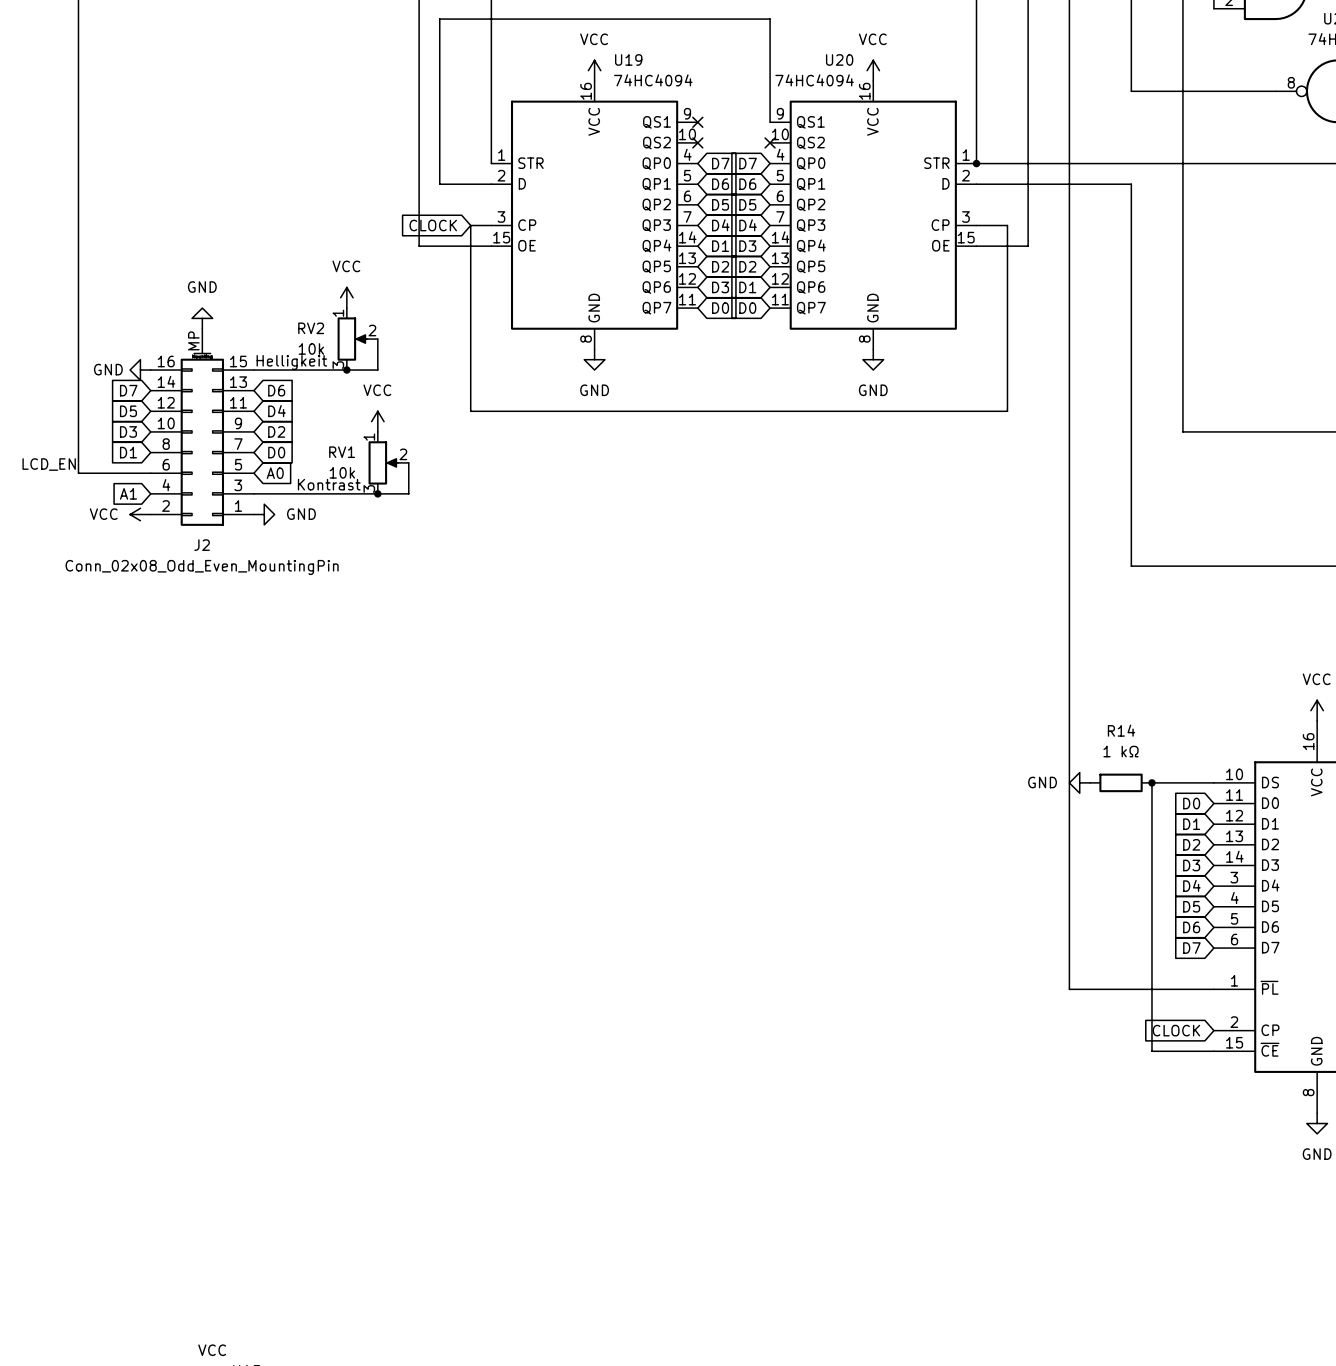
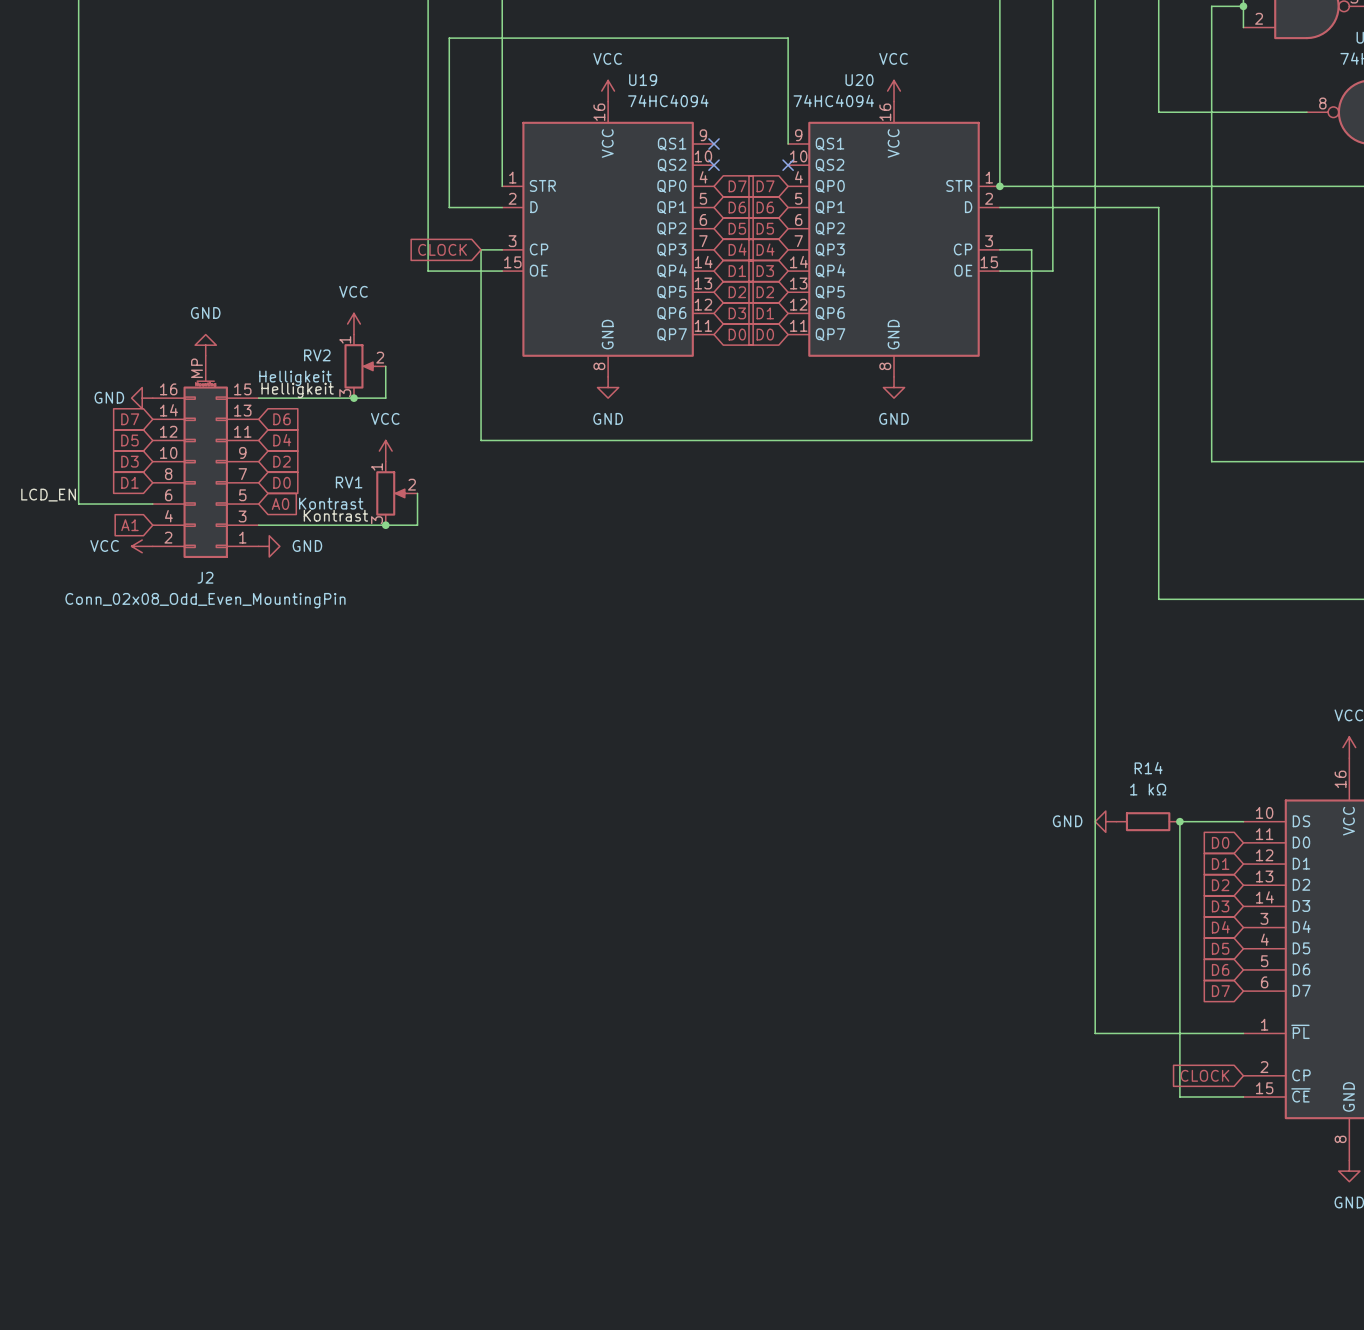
RV2 value: 10k (311, 348) -> Helligkeit (295, 378)
RV1 value: 10k (342, 472) -> Kontrast (331, 503)

